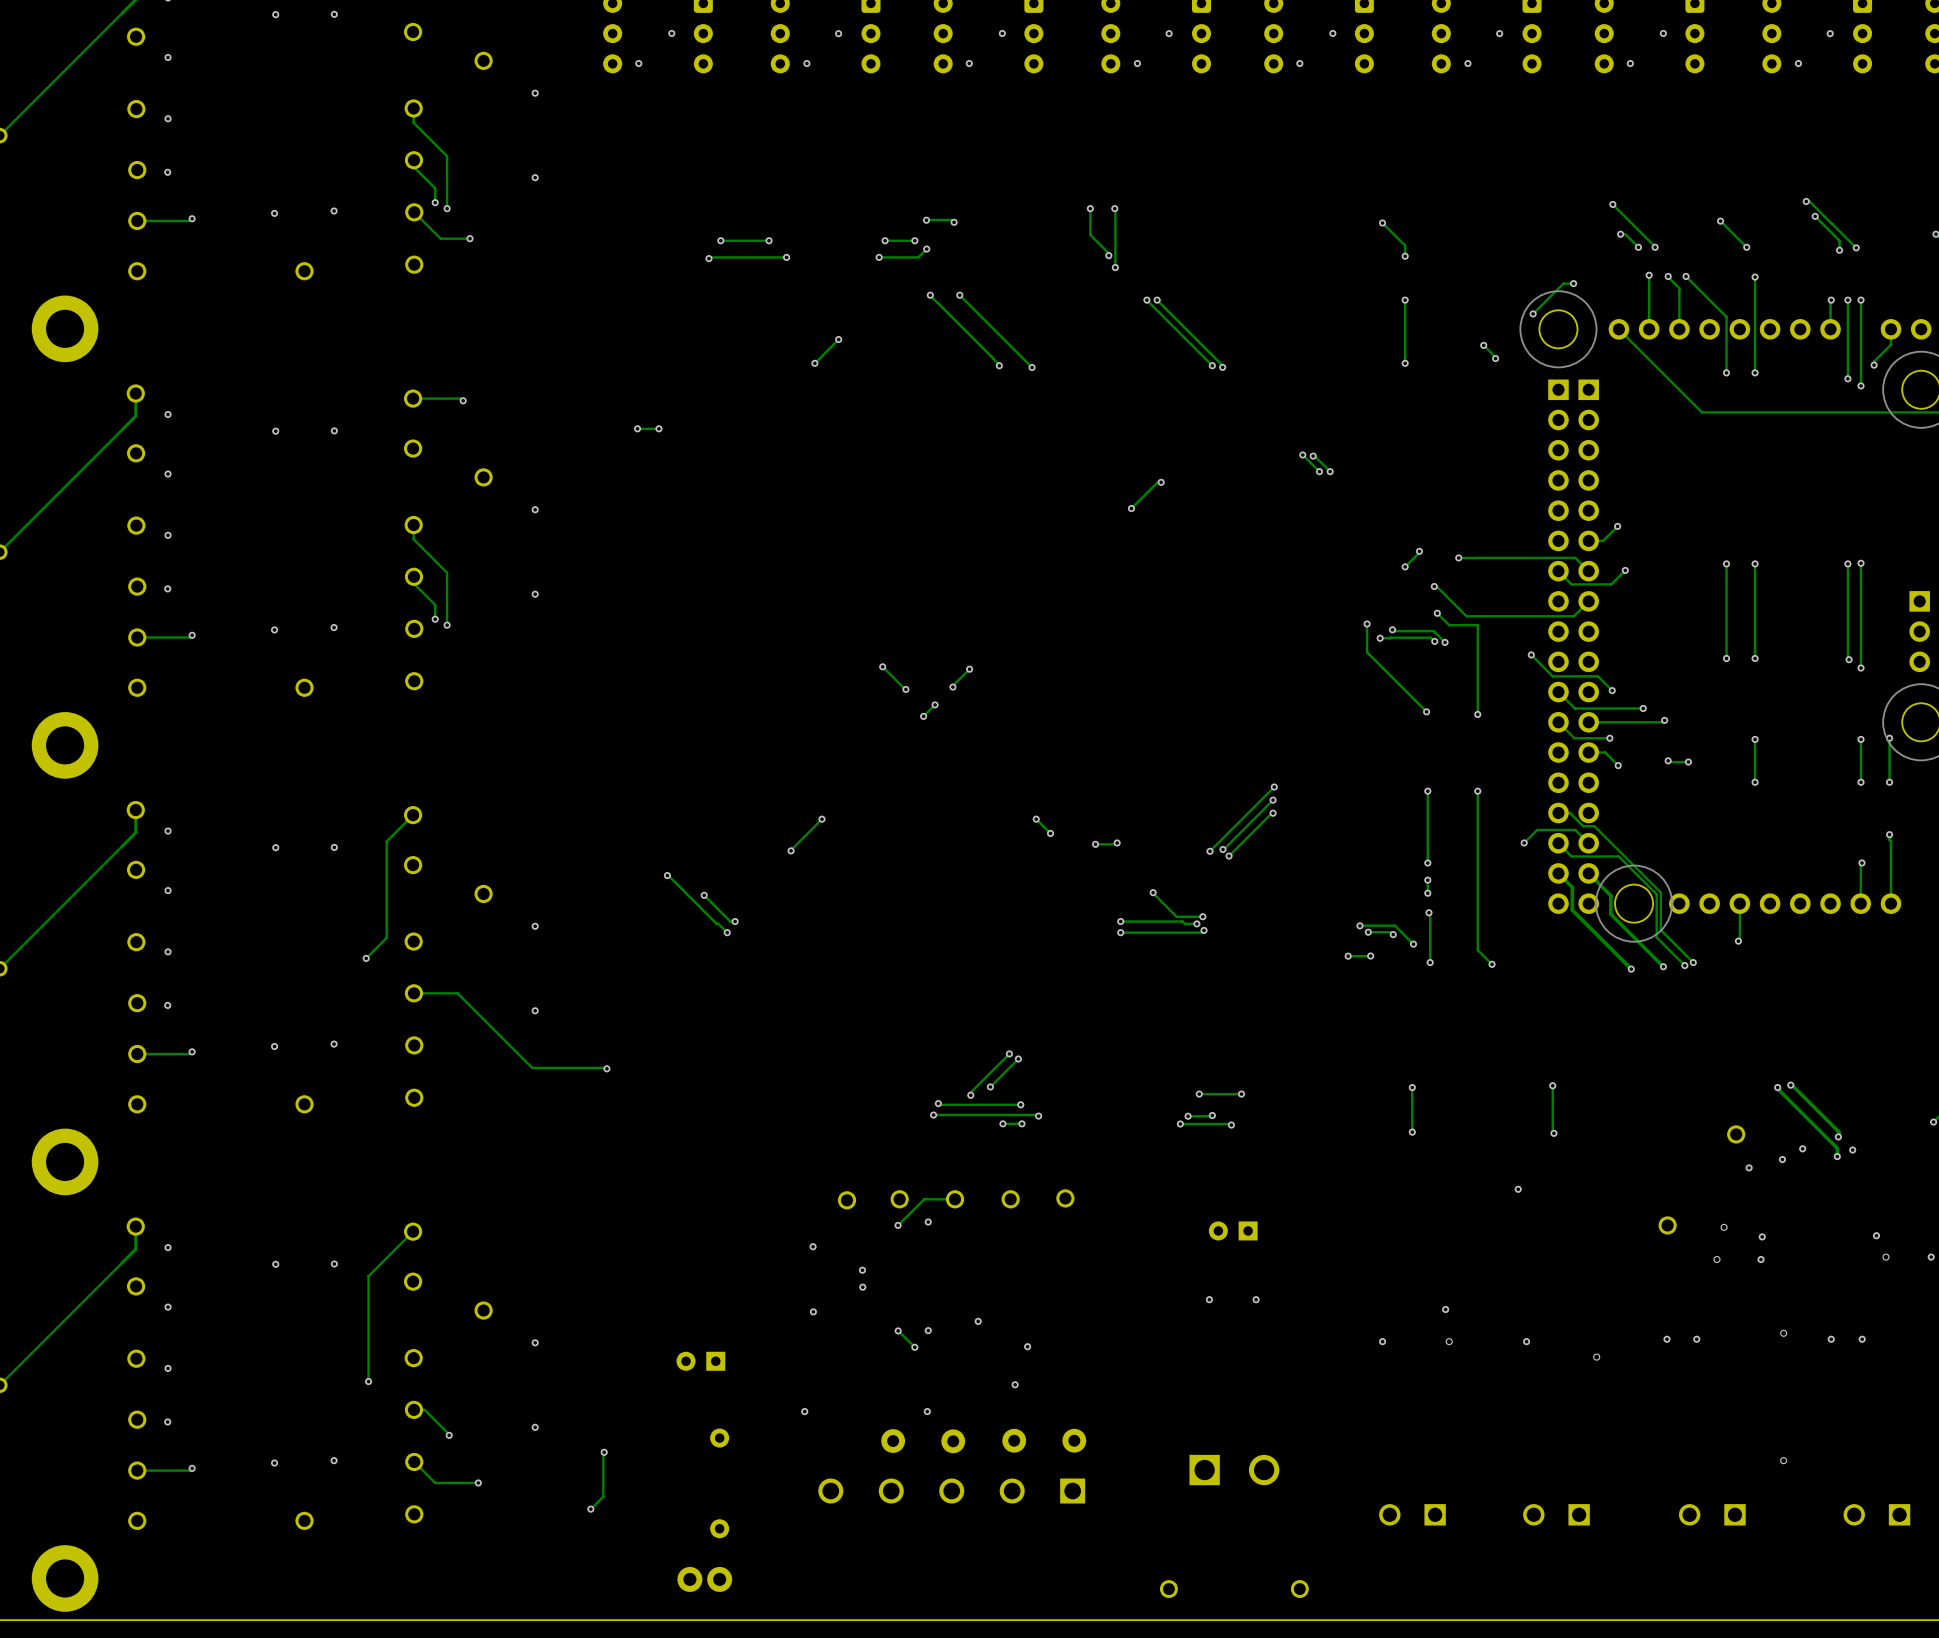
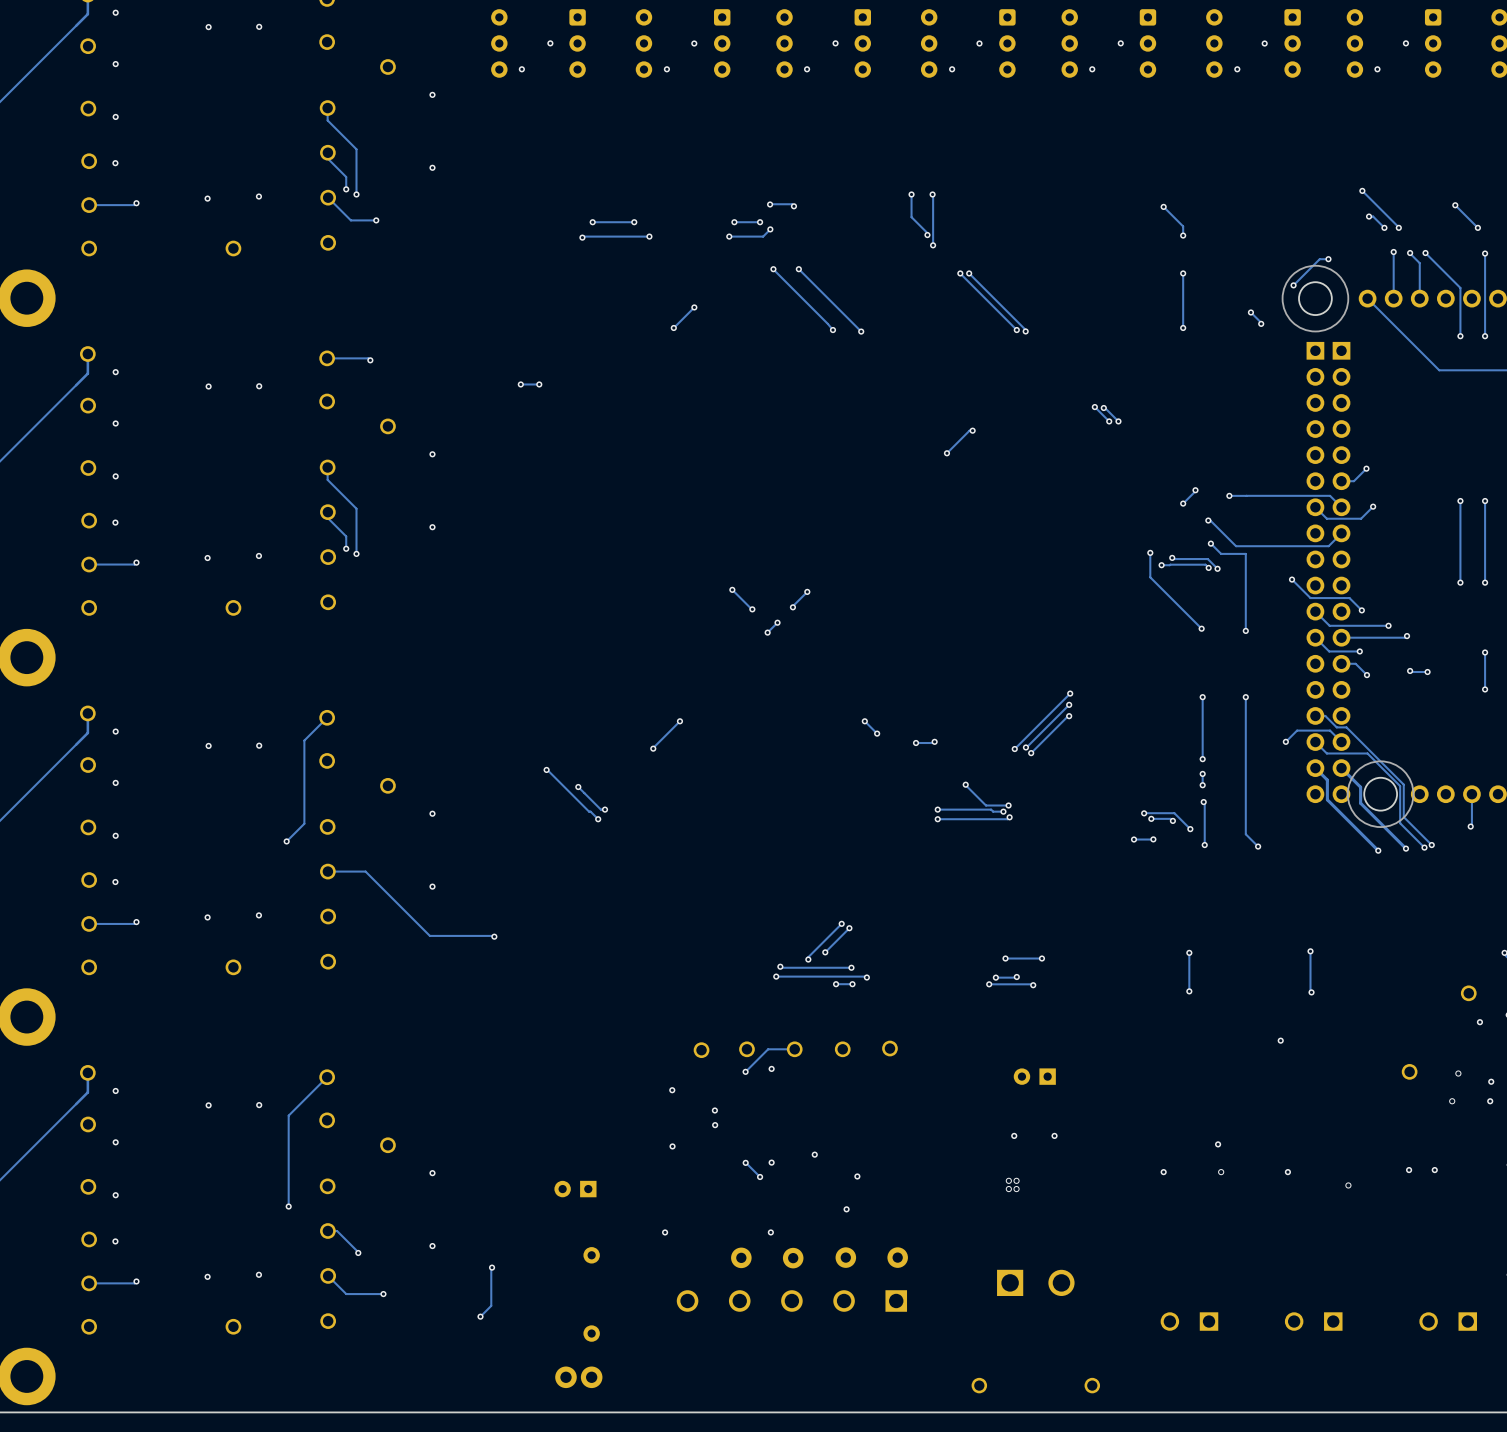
via: none -> (1008, 1180)
via: none -> (1016, 1180)
via: none -> (1008, 1189)
via: none -> (1016, 1189)

